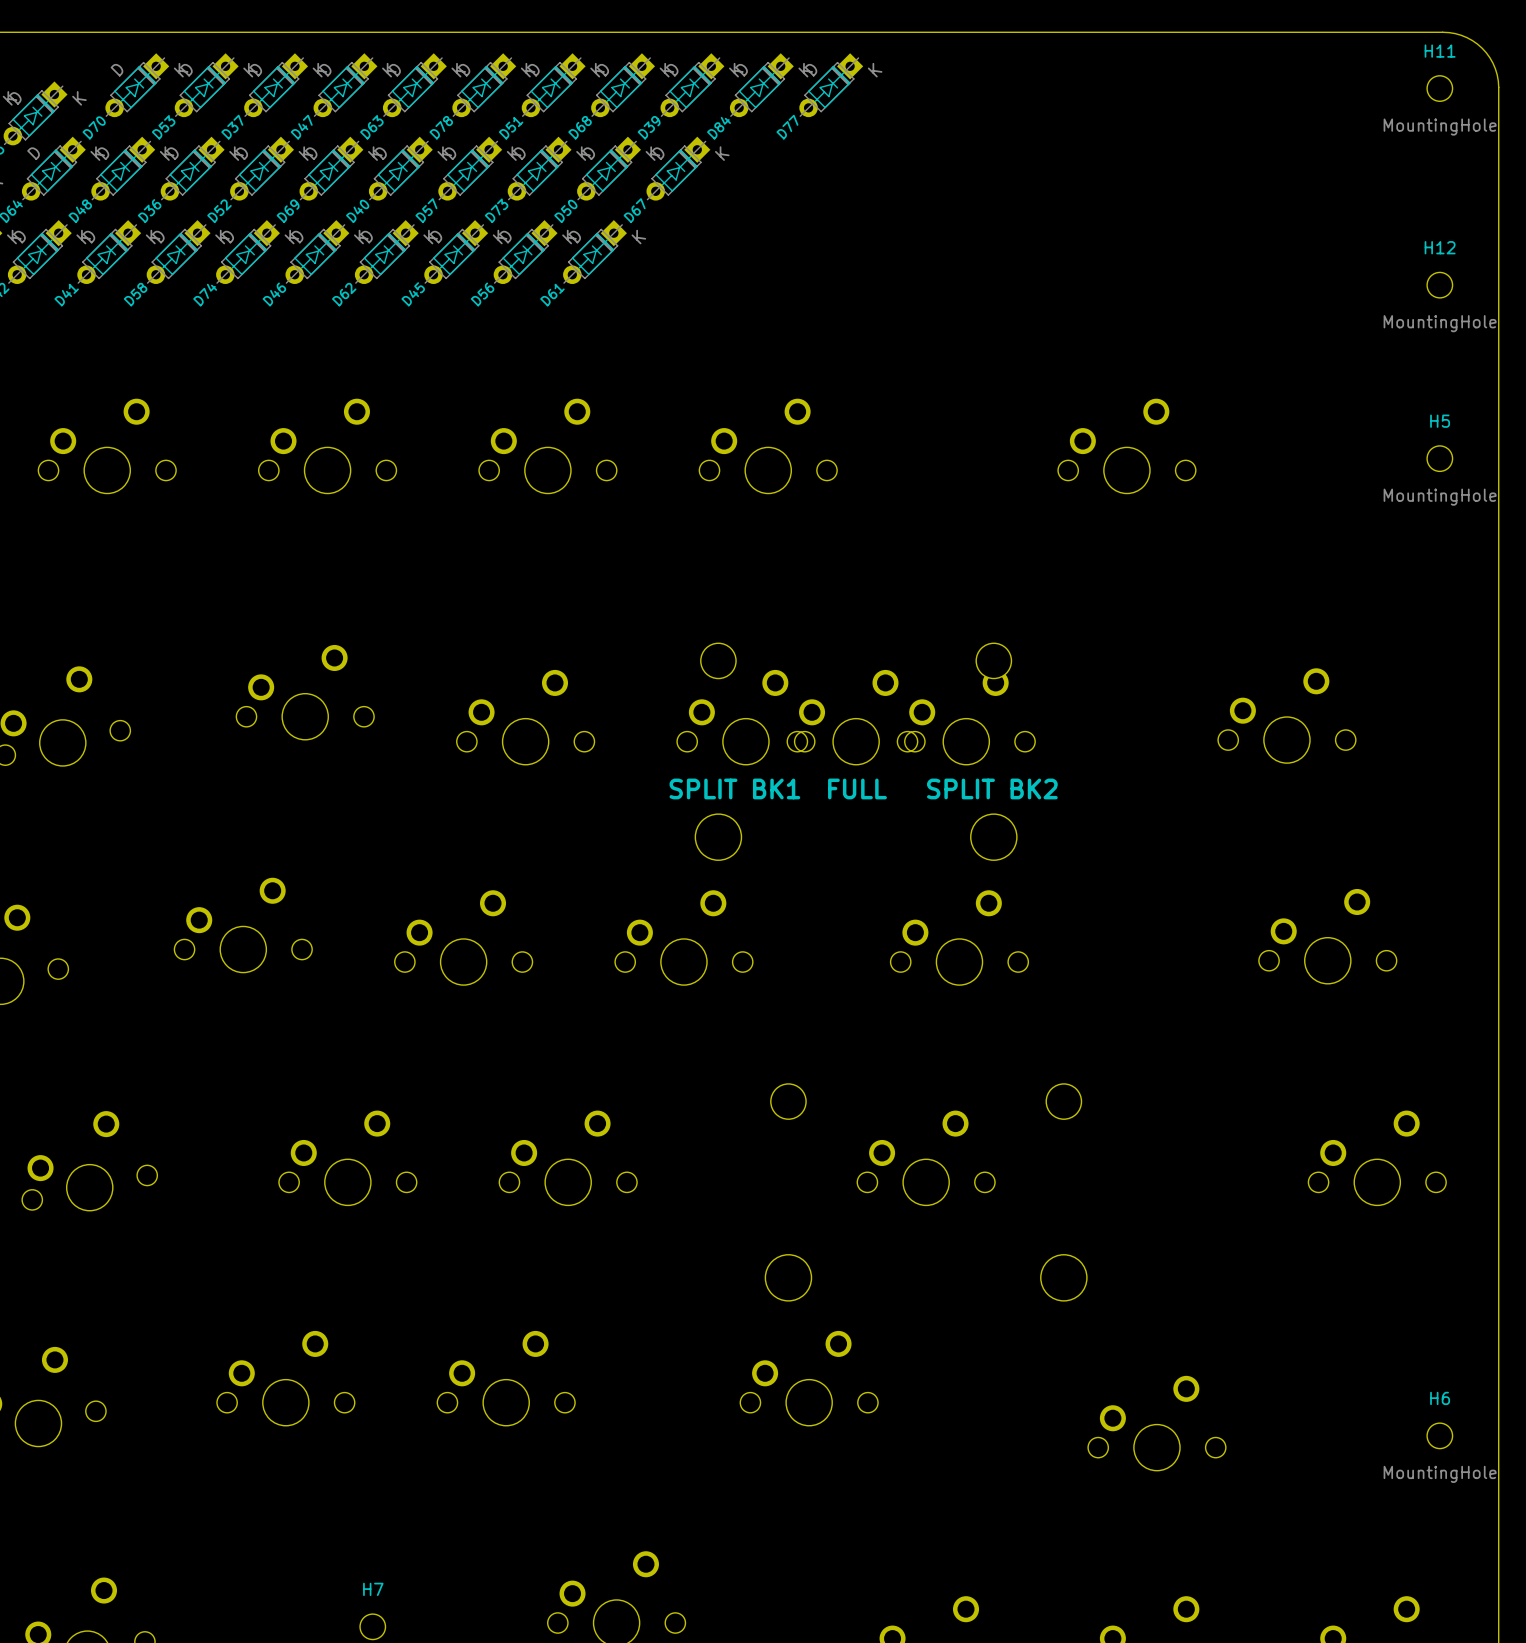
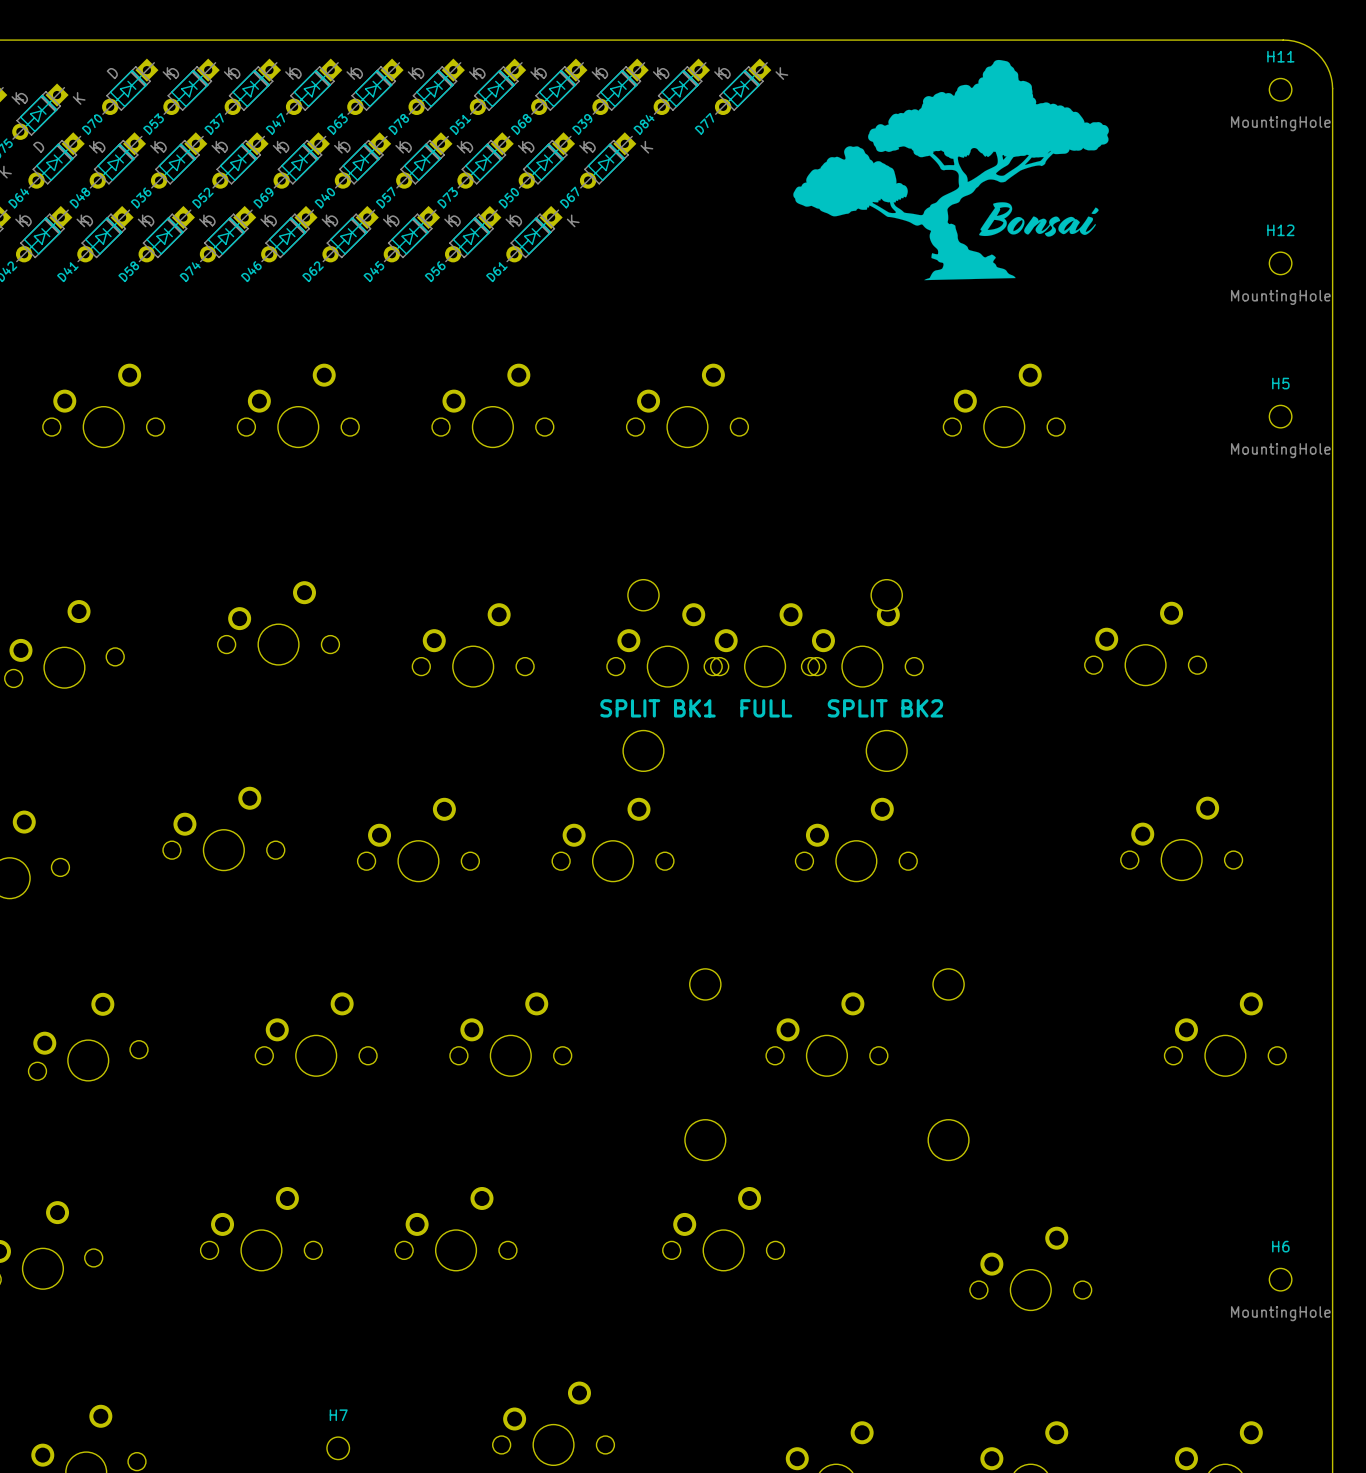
drawing: none -> [793, 59, 1109, 281]

